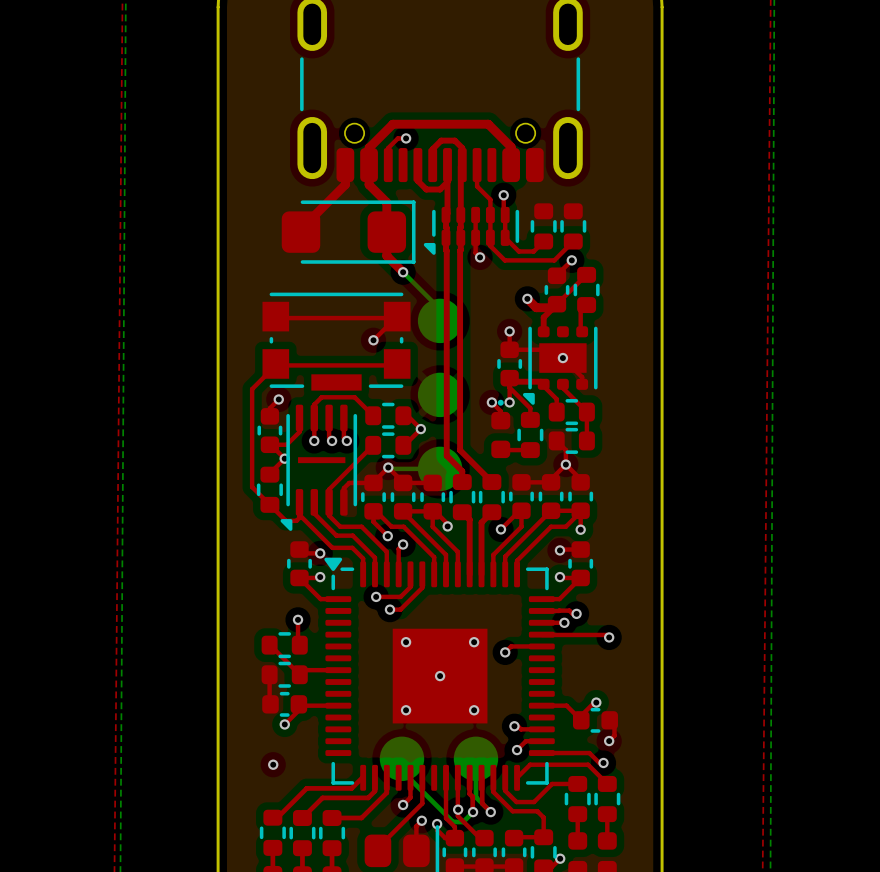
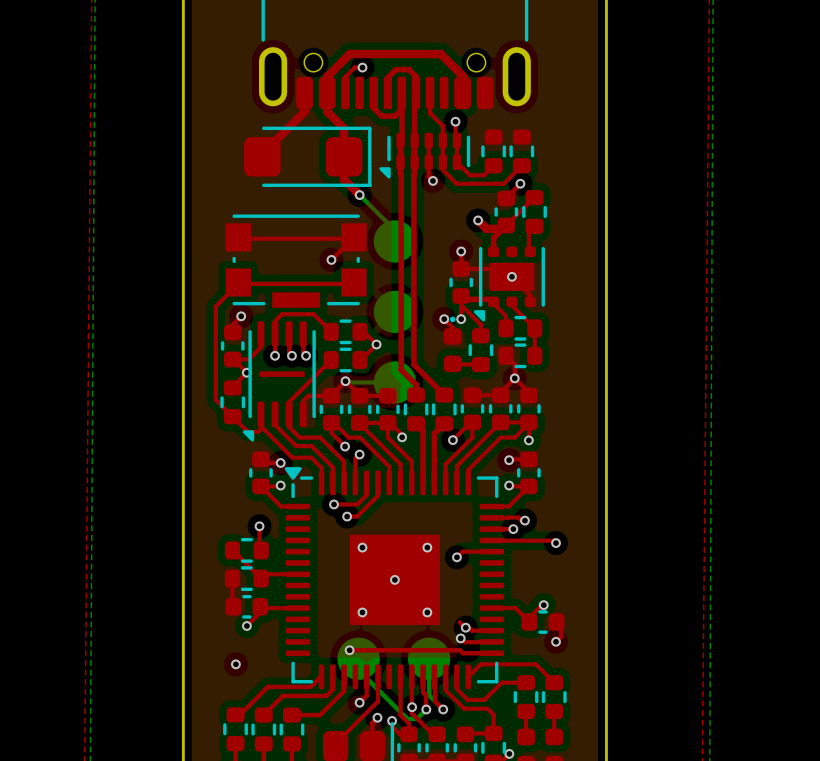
top track: none -> (459, 622) (465, 627)
top track: (525, 741) (517, 750) -> (476, 642) (464, 642) (460, 638)
via: none -> (349, 650)
via position: (517, 750) -> (460, 638)
top track: (541, 753) (589, 753) (599, 763) (603, 763) -> (491, 653) (462, 653) (459, 650) (348, 650)
via: (603, 762) -> none

